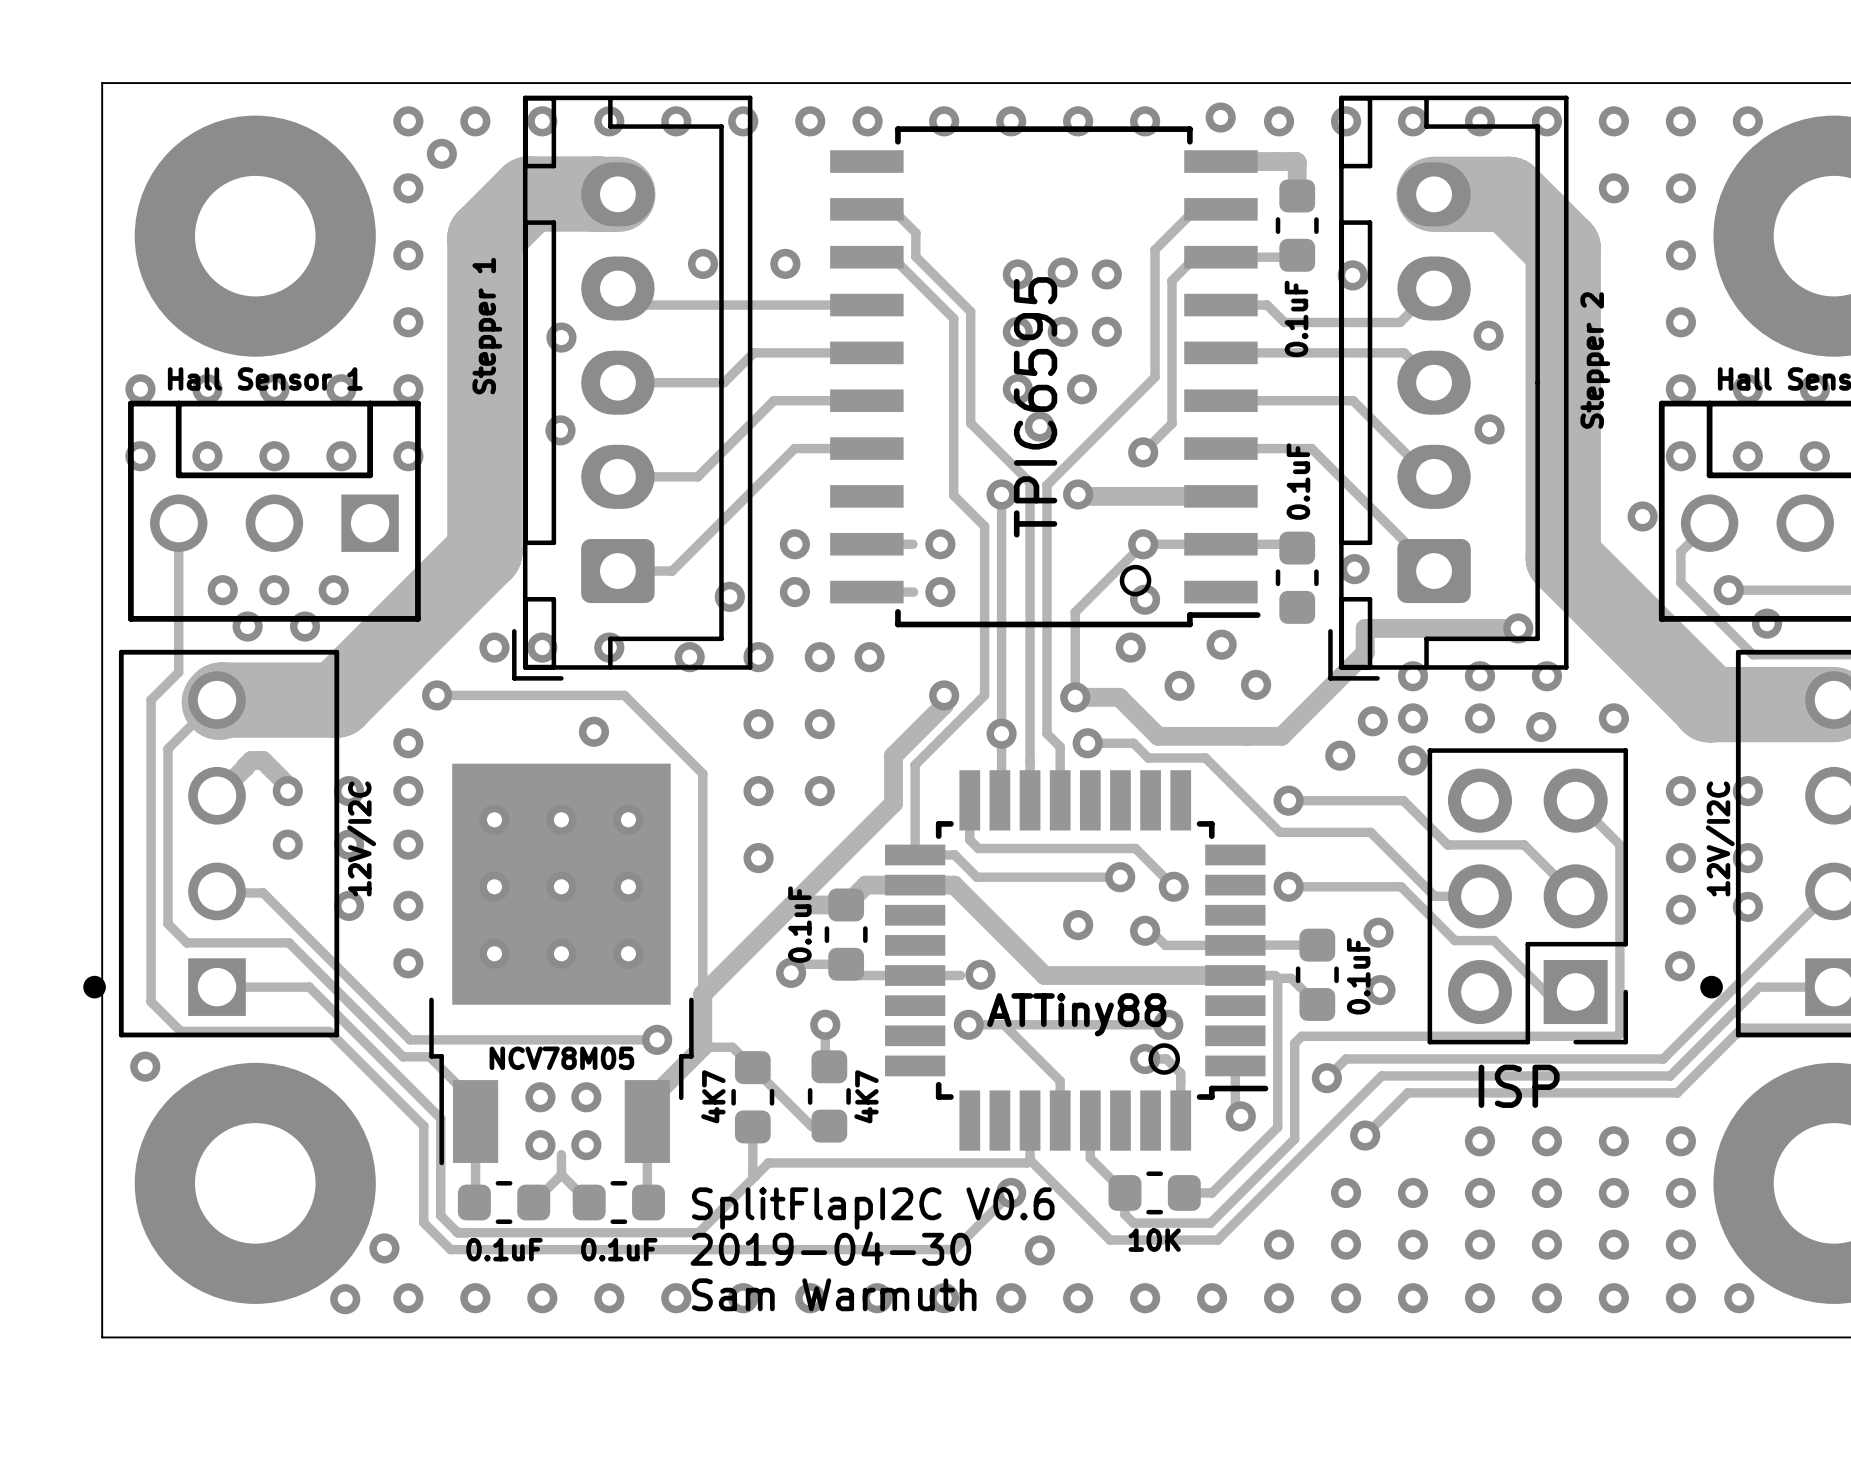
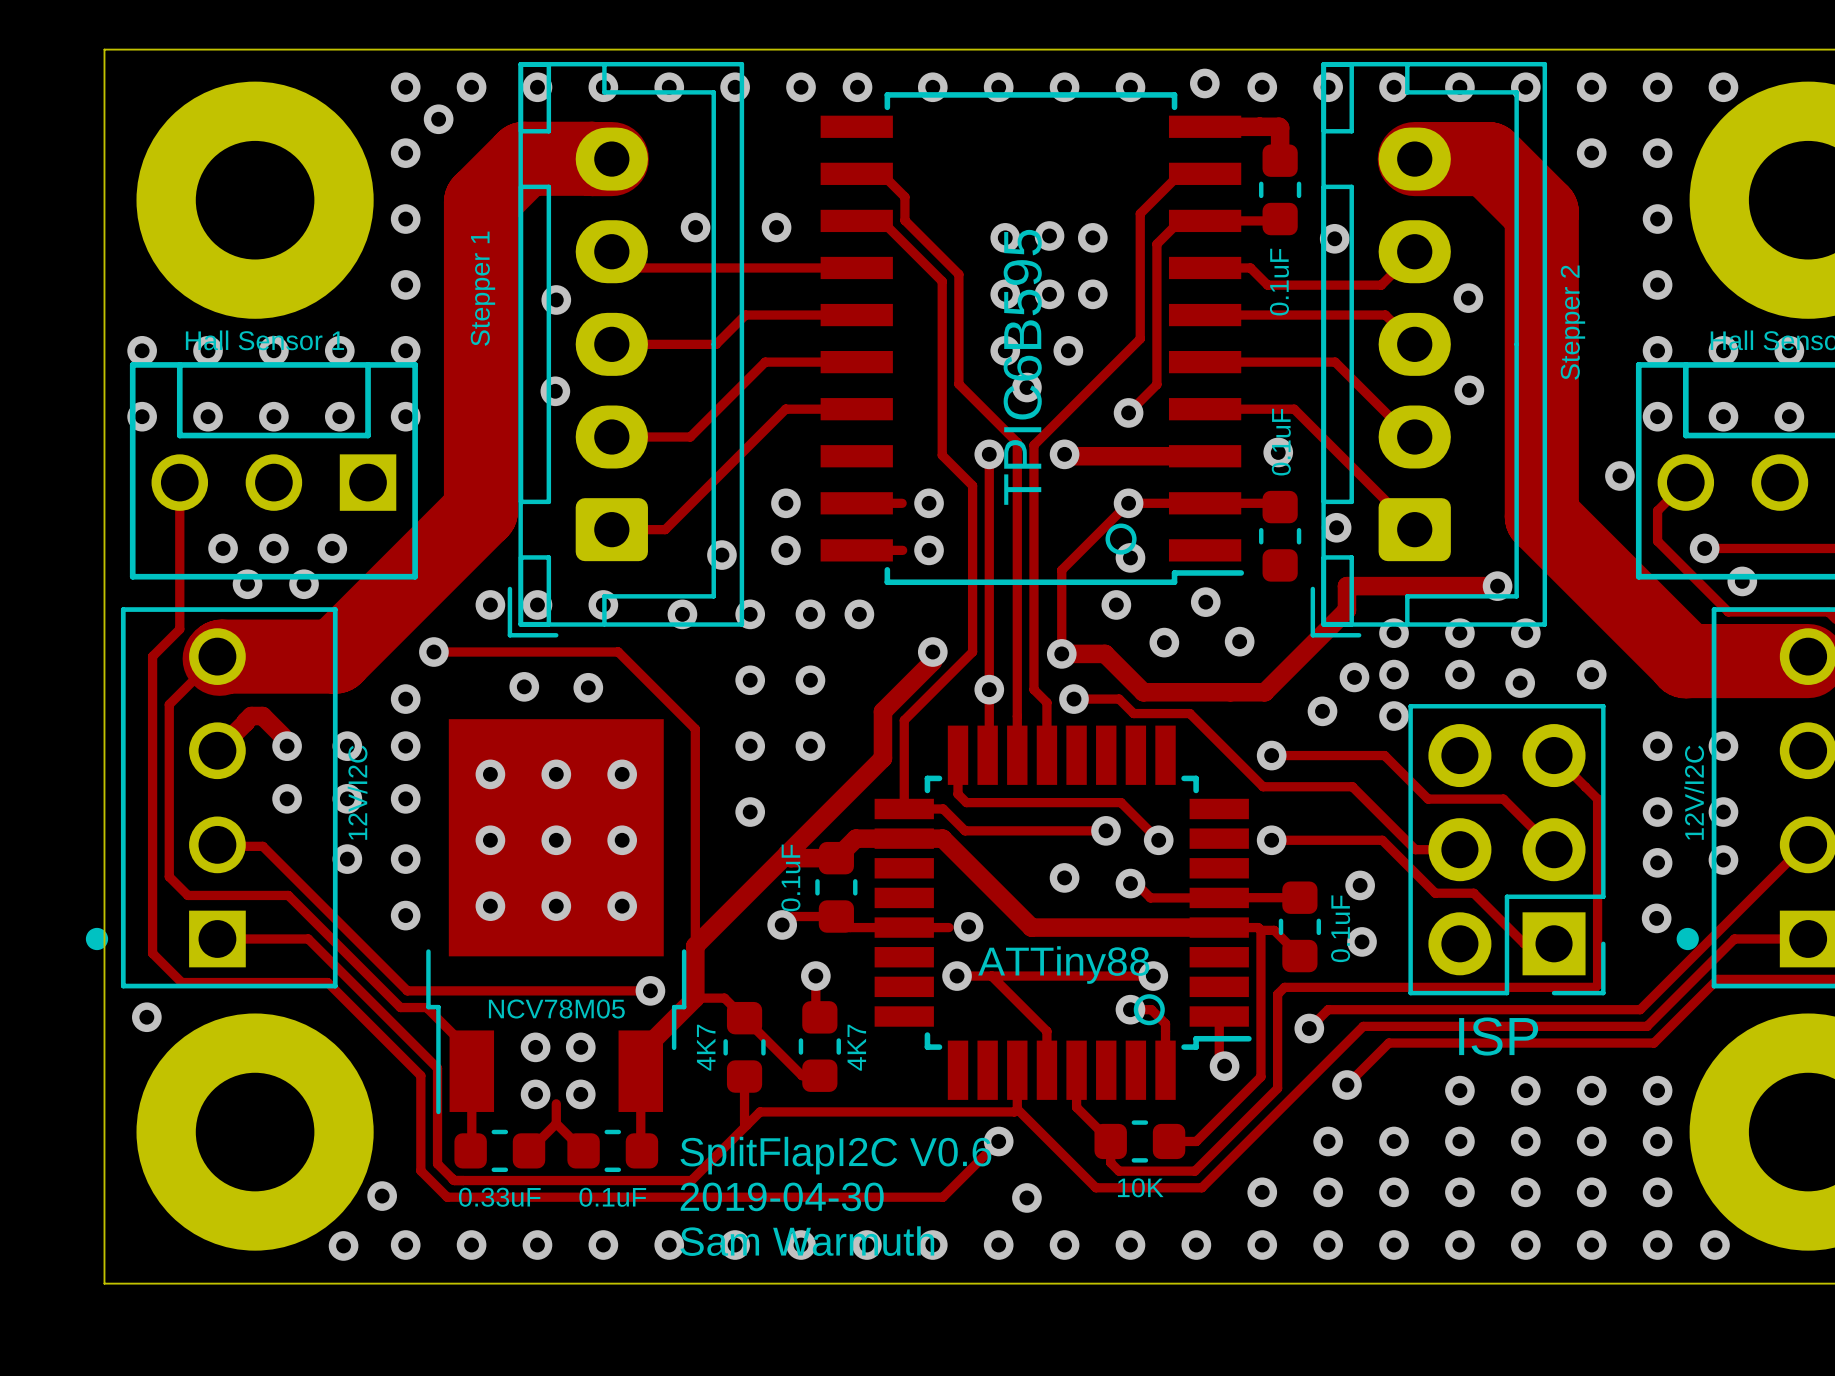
text: TPIC6595 (1035, 407) -> TPIC6B595 (1022, 367)
via: none -> (1278, 452)
via: none -> (524, 686)
text: 0.1uF (504, 1249) -> 0.33uF (499, 1197)

